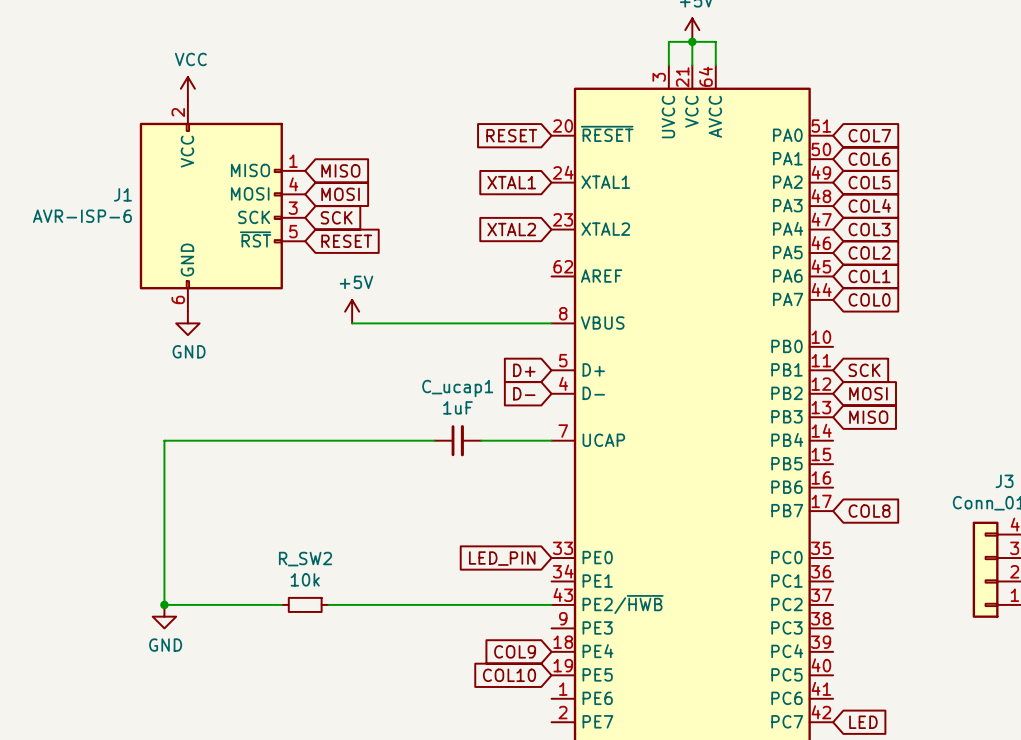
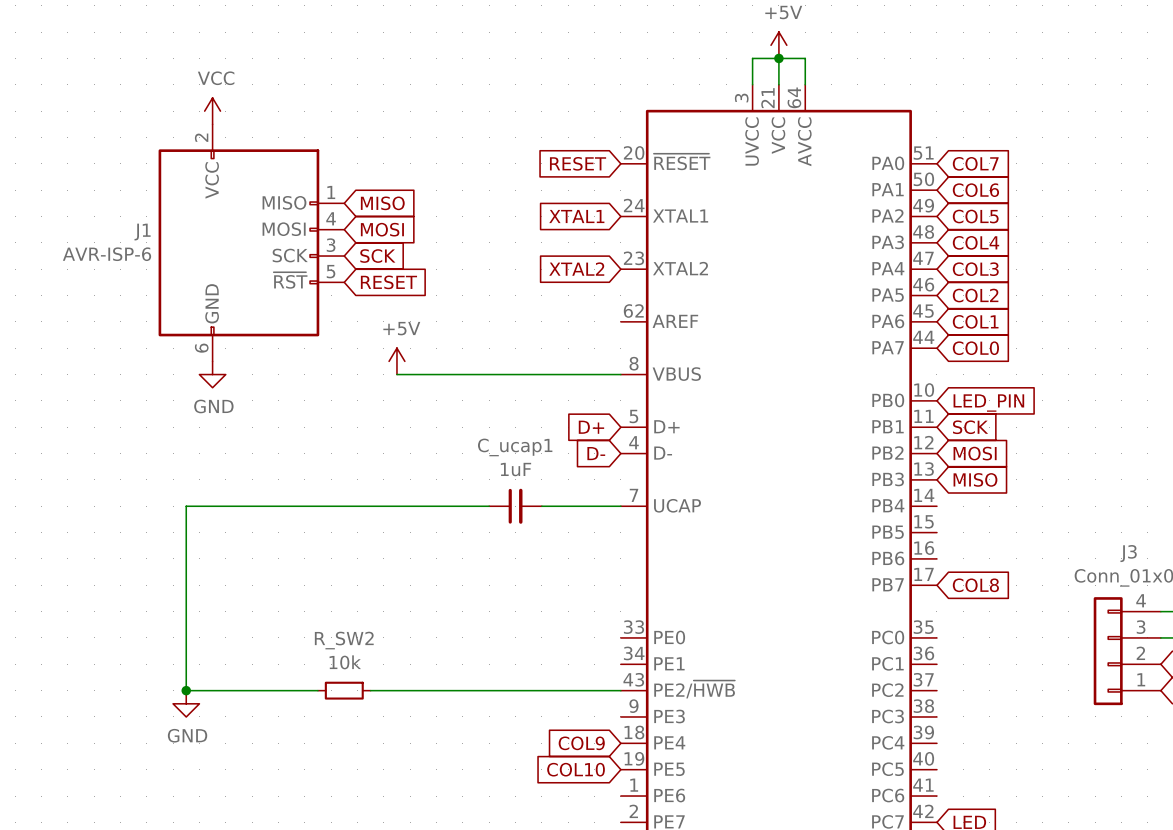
global label: none -> LED_PIN (988, 403)
global label: LED_PIN (502, 558) -> none

